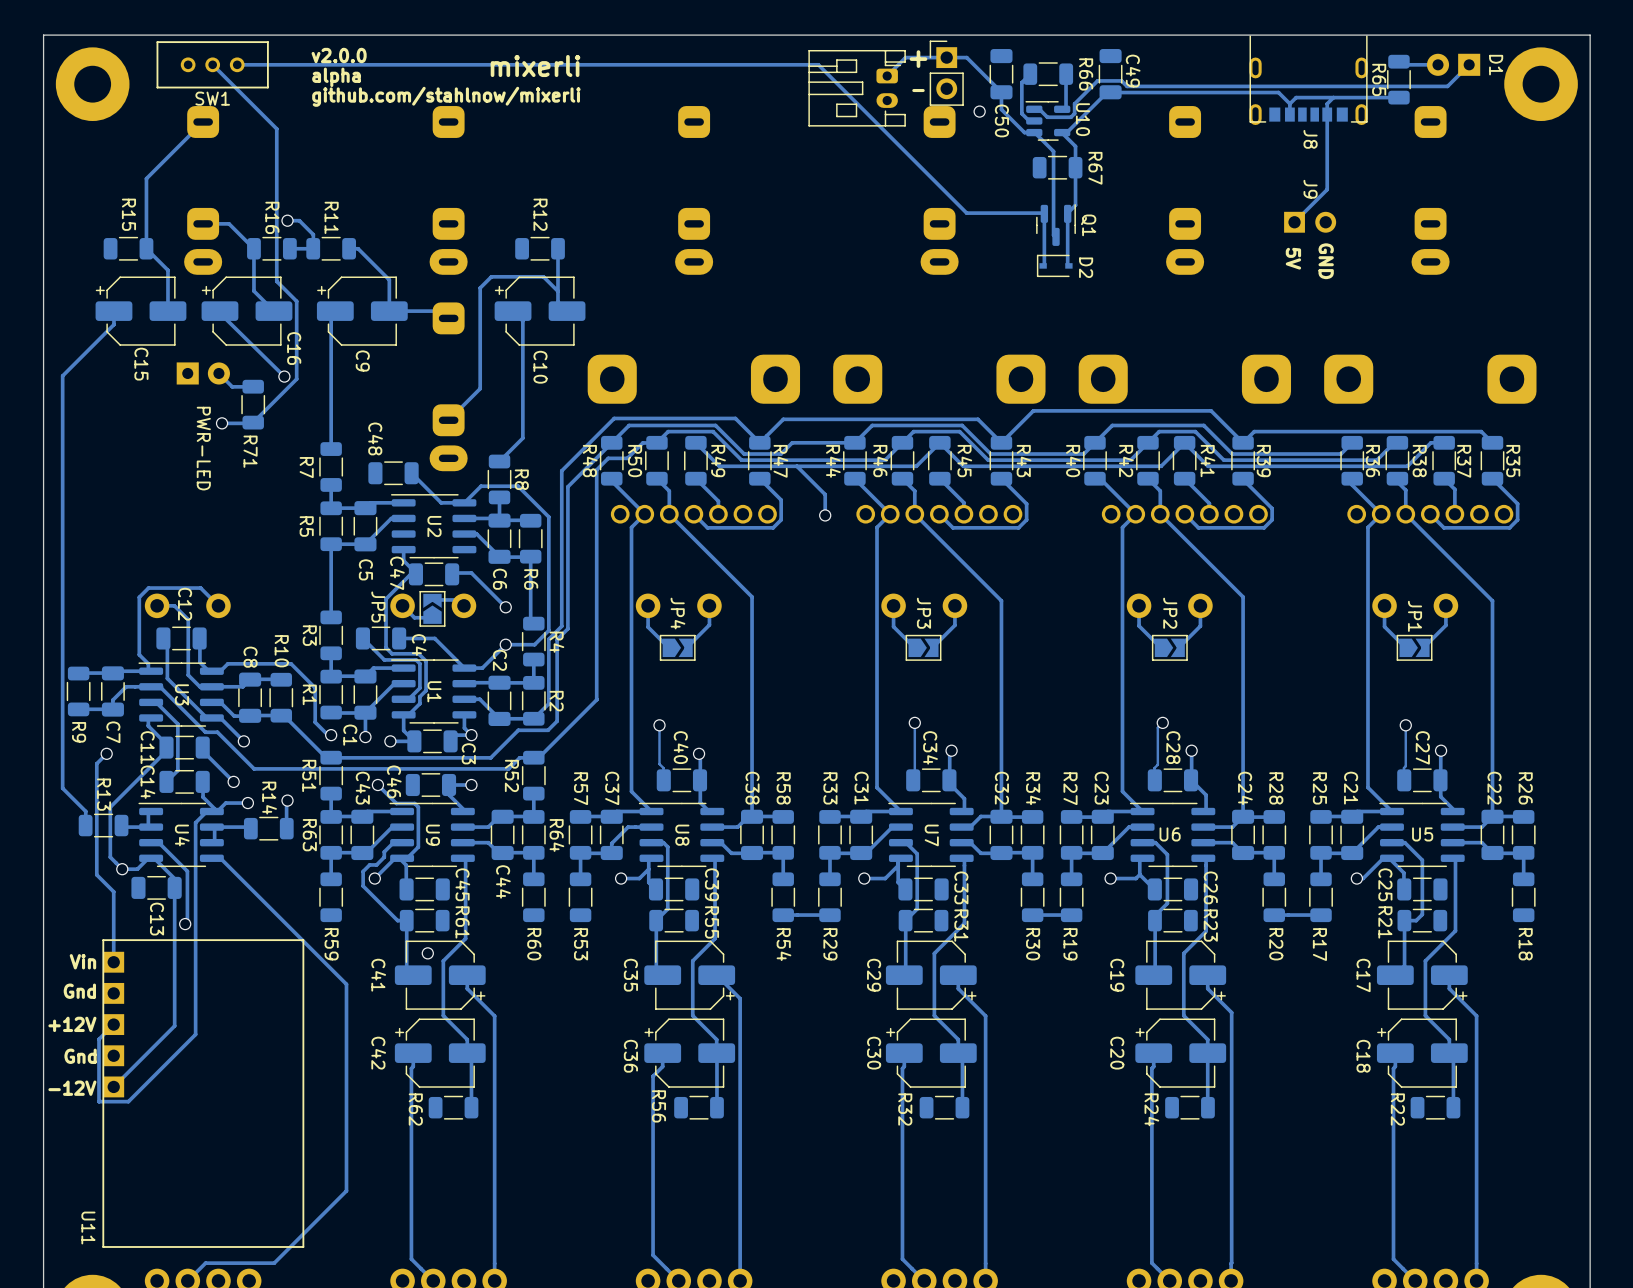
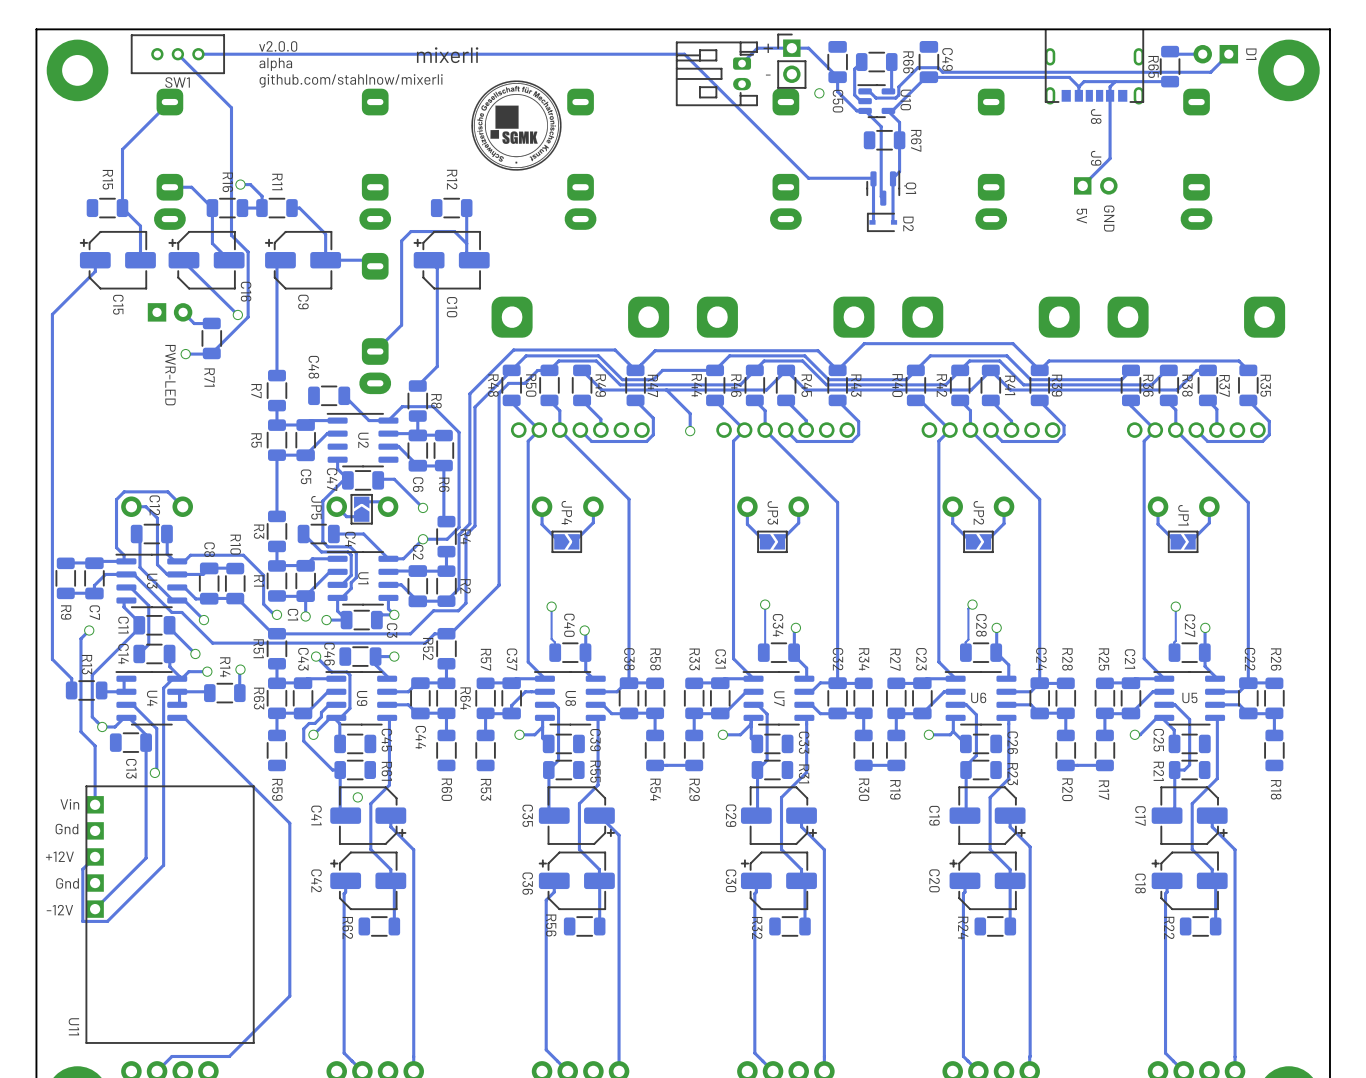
drawing: none -> [471, 80, 562, 171]

